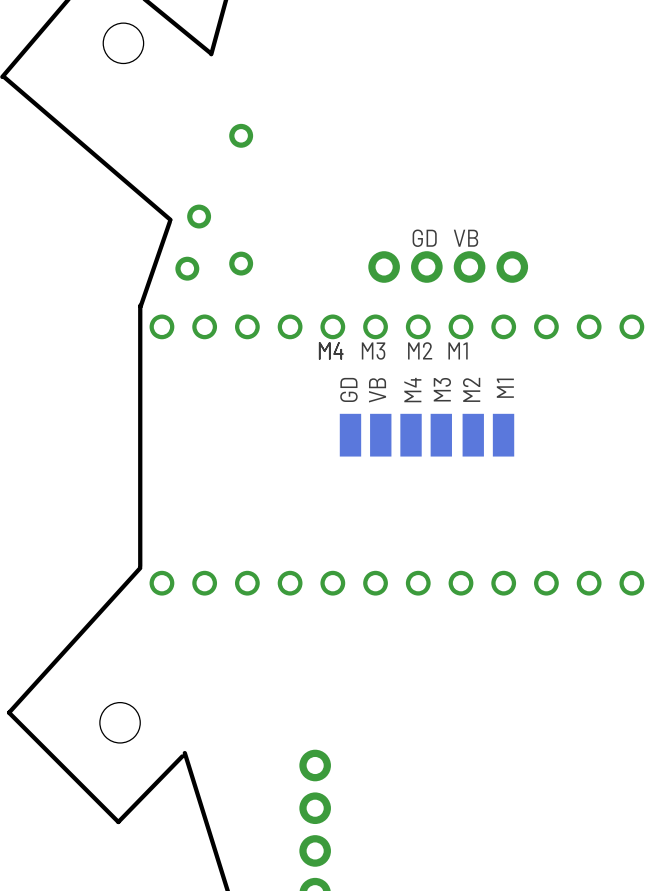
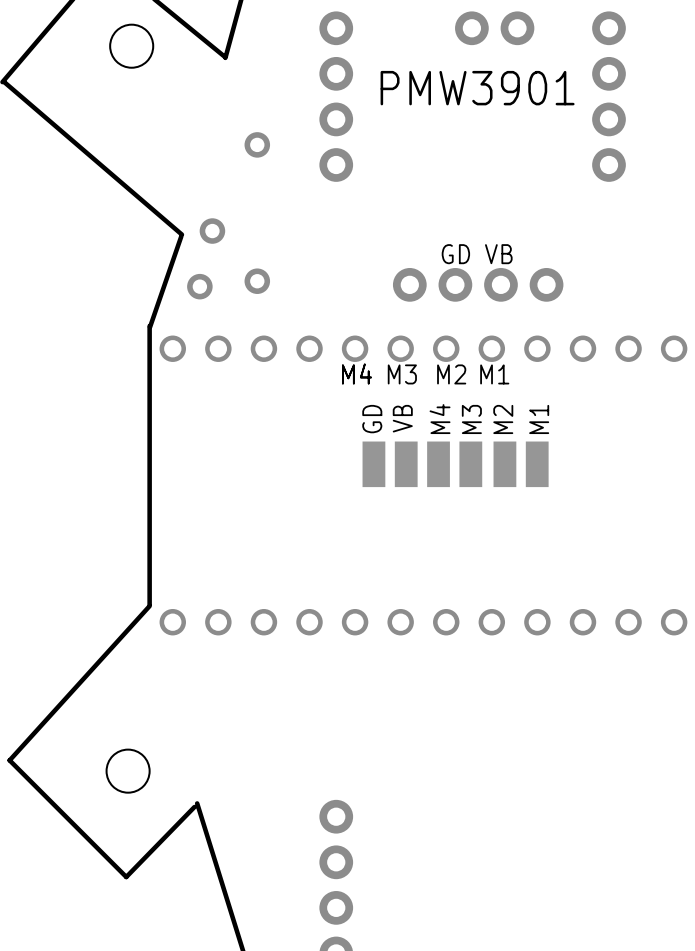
part: none -> (494, 28)
text: none -> PMW3901 (477, 88)
part: none -> (336, 96)
part: none -> (608, 96)

